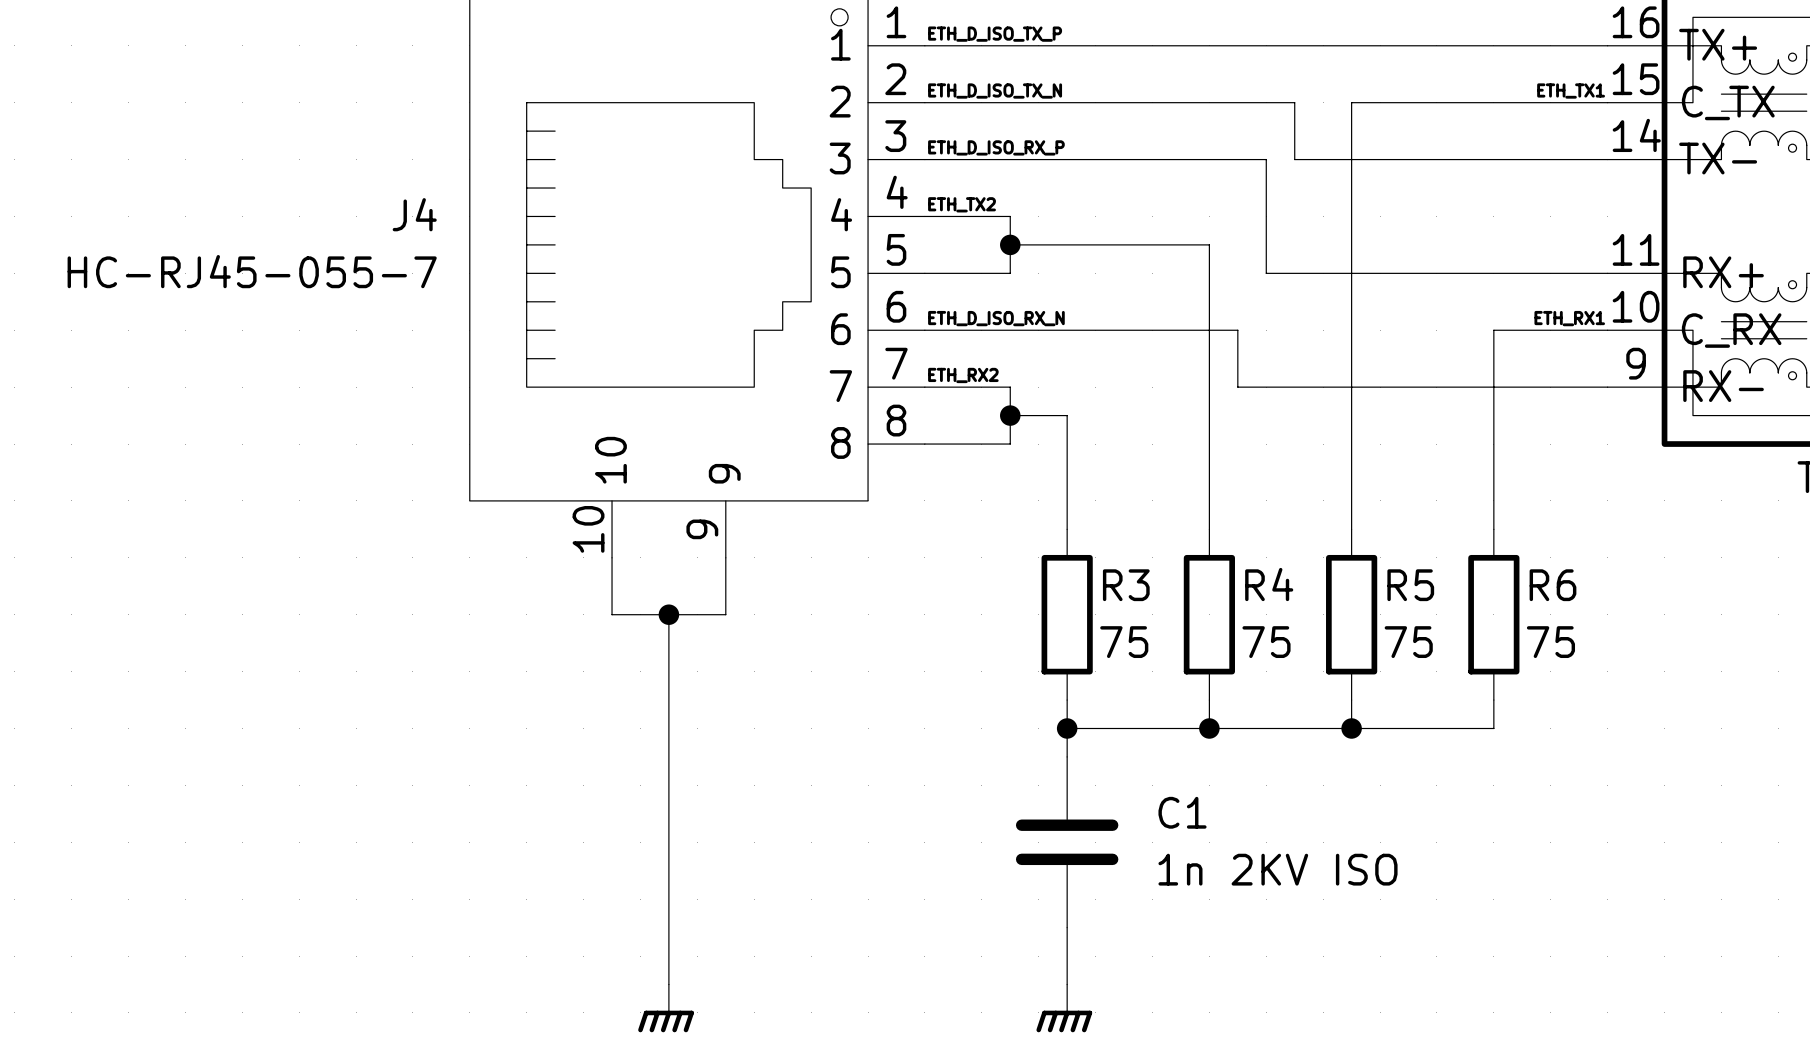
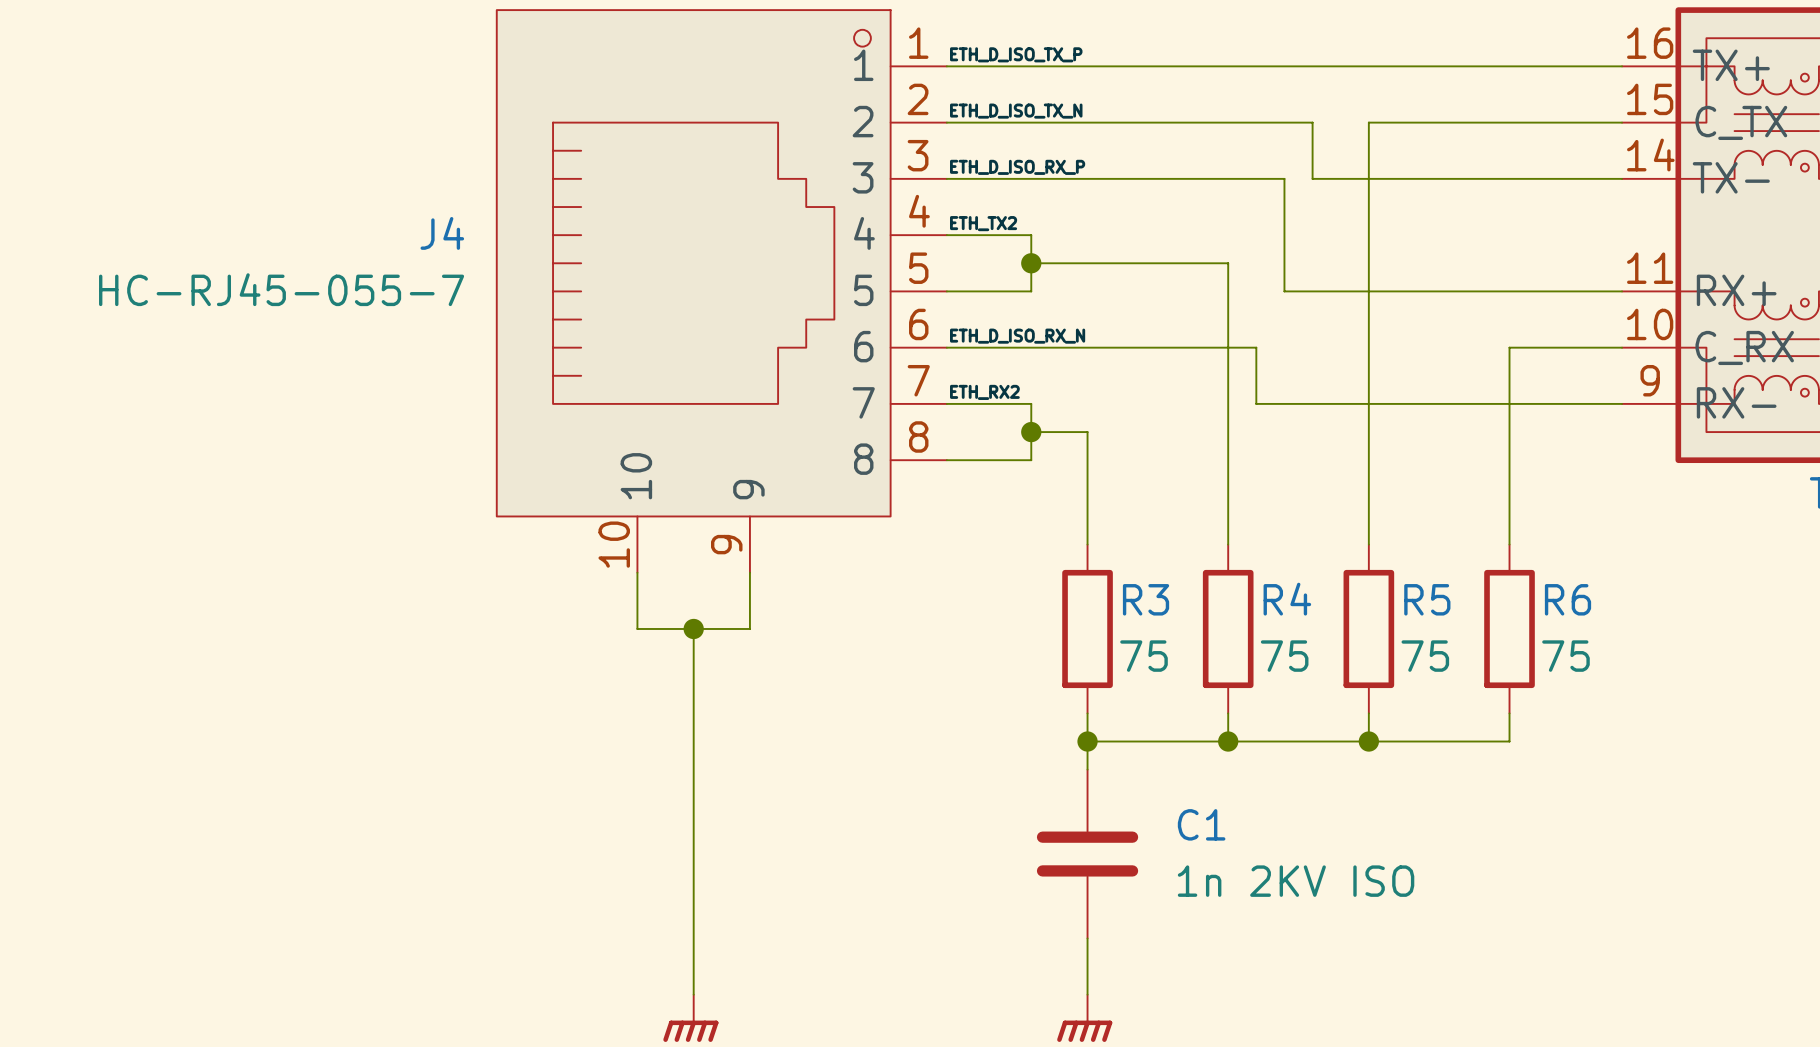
label: ETH_TX1 (1571, 91) -> none
label: ETH_RX1 (1569, 318) -> none

